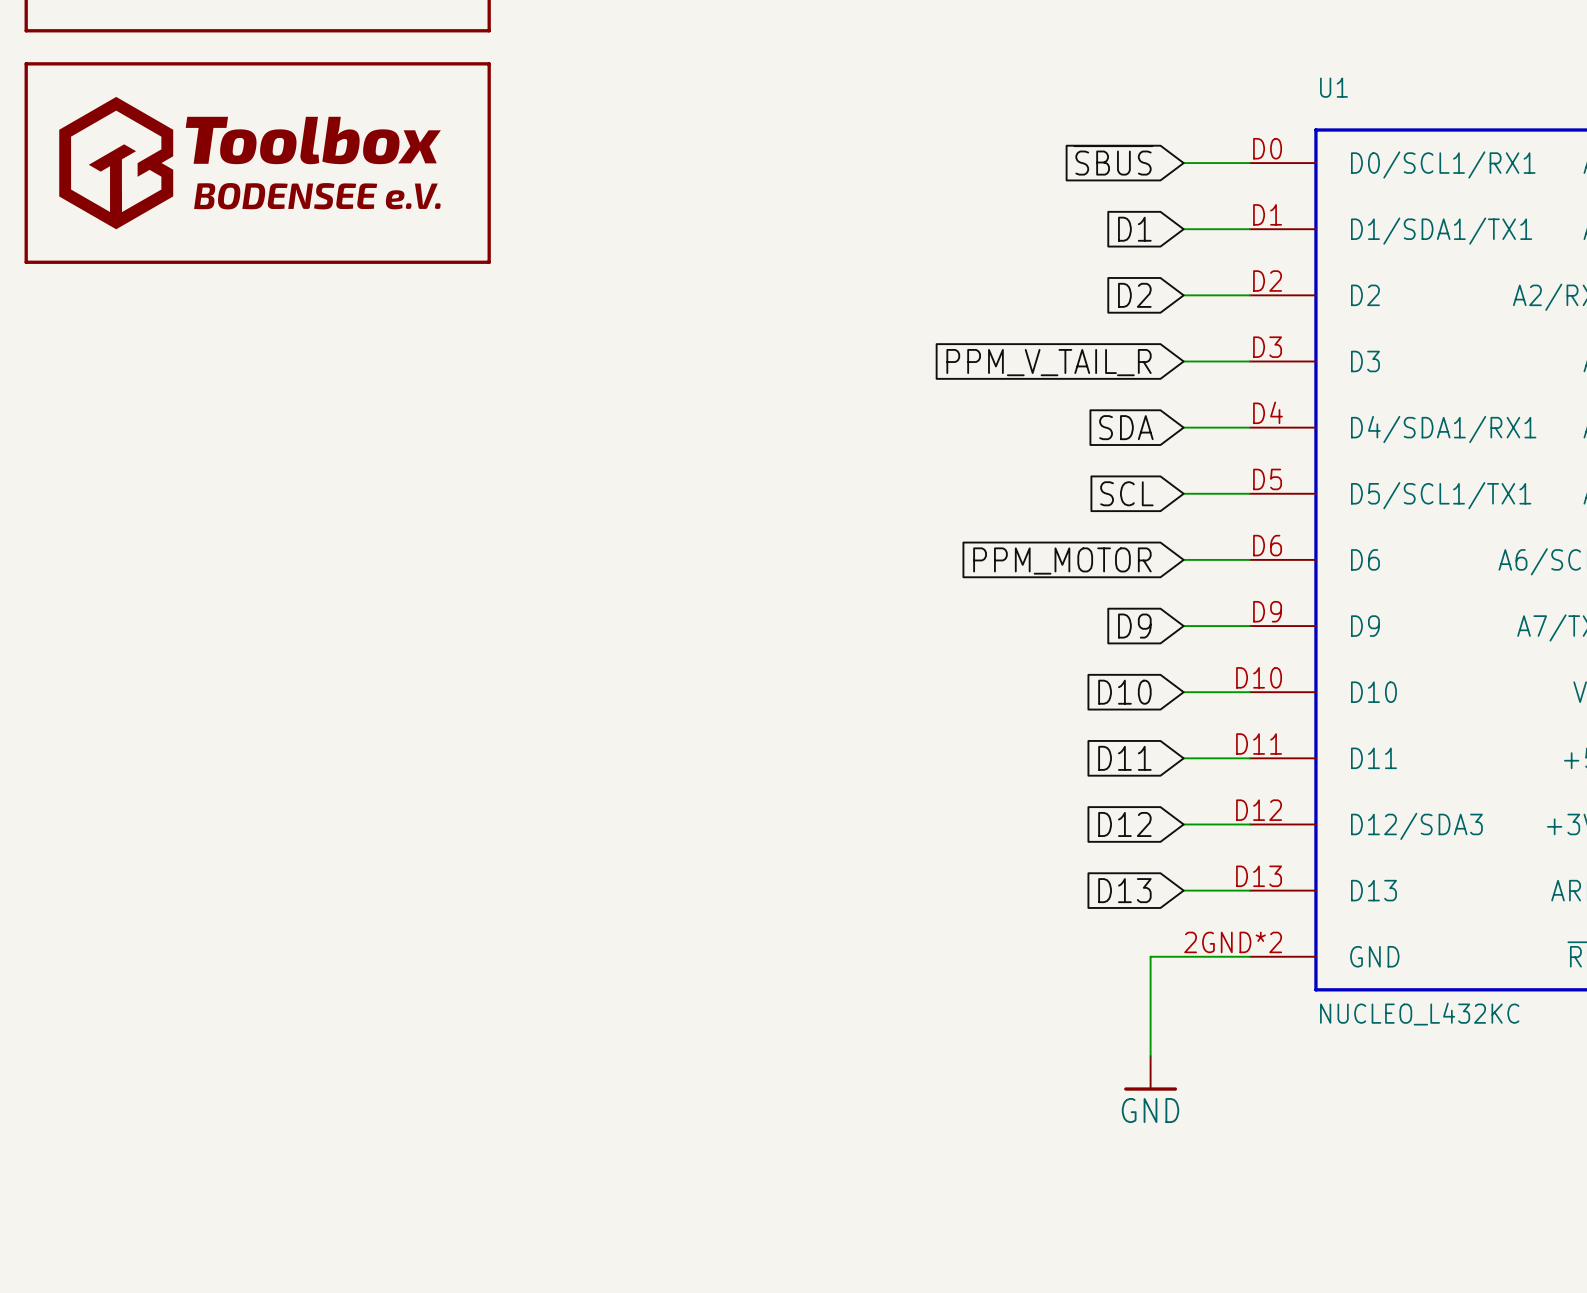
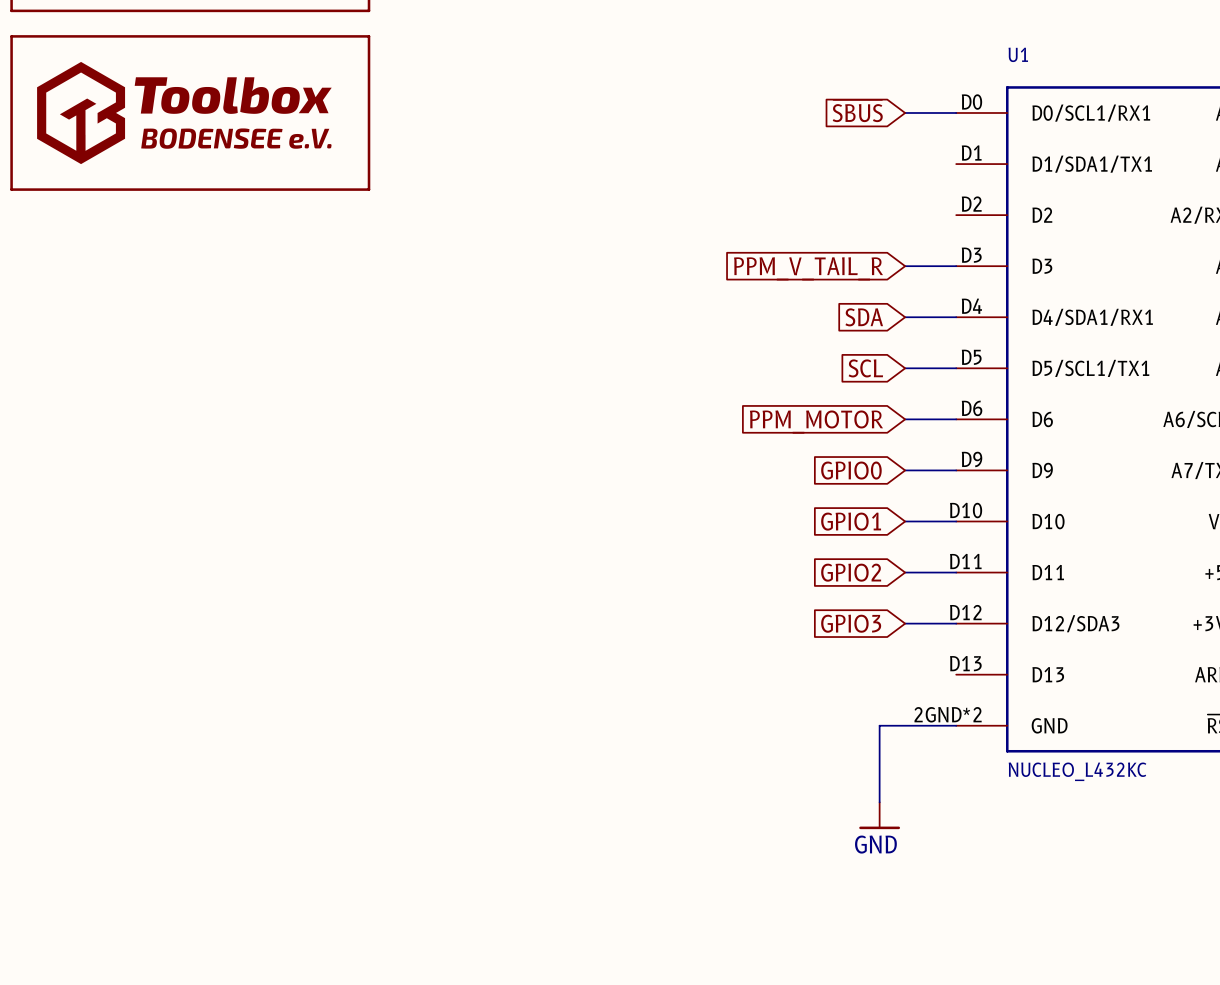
global label: D1 (1134, 229) -> none
wire: (1183, 229) (1249, 229) -> none
global label: D2 (1134, 295) -> none
wire: (1183, 295) (1249, 295) -> none
global label: D9 (1134, 626) -> GPIO0 (851, 470)
global label: D10 (1124, 692) -> GPIO1 (851, 521)
global label: D11 (1124, 758) -> GPIO2 (851, 572)
global label: D12 (1124, 824) -> GPIO3 (851, 623)
global label: D13 (1124, 890) -> none
wire: (1183, 890) (1249, 890) -> none

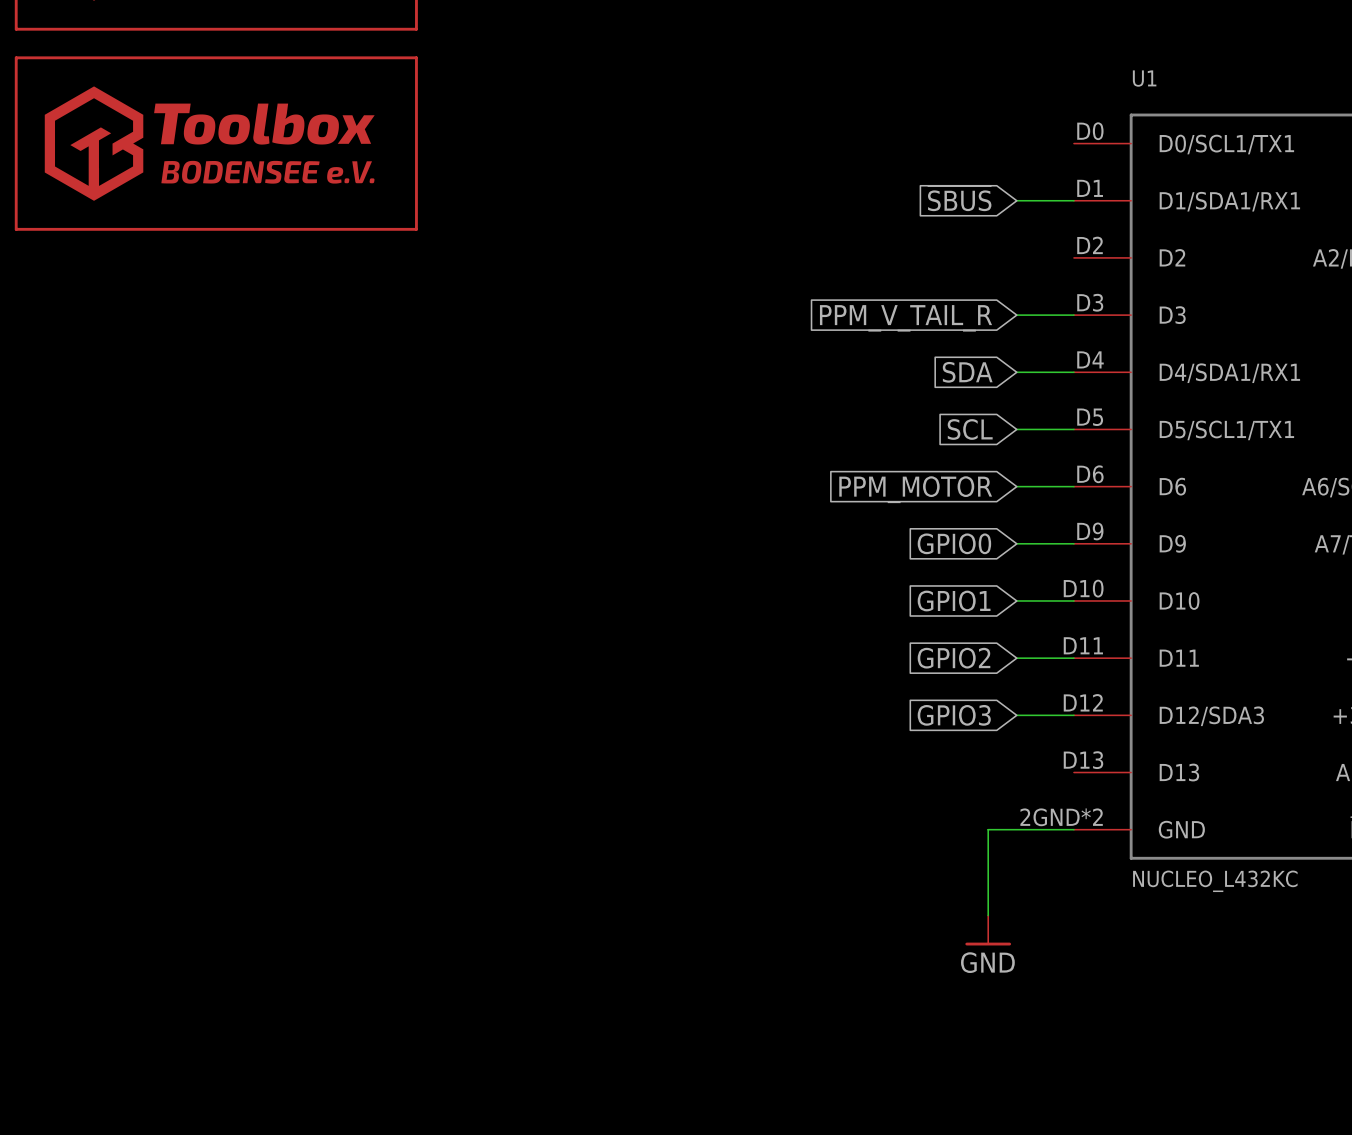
global label position: ~{SBUS} (857, 111) -> ~{SBUS} (959, 198)
wire: (905, 112) (956, 112) -> (1016, 200) (1073, 200)
U1 pin name: D0/SCL1/RX1 (1091, 113) -> D0/SCL1/TX1 (1226, 144)
U1 pin name: D1/SDA1/TX1 (1092, 164) -> D1/SDA1/RX1 (1229, 201)

